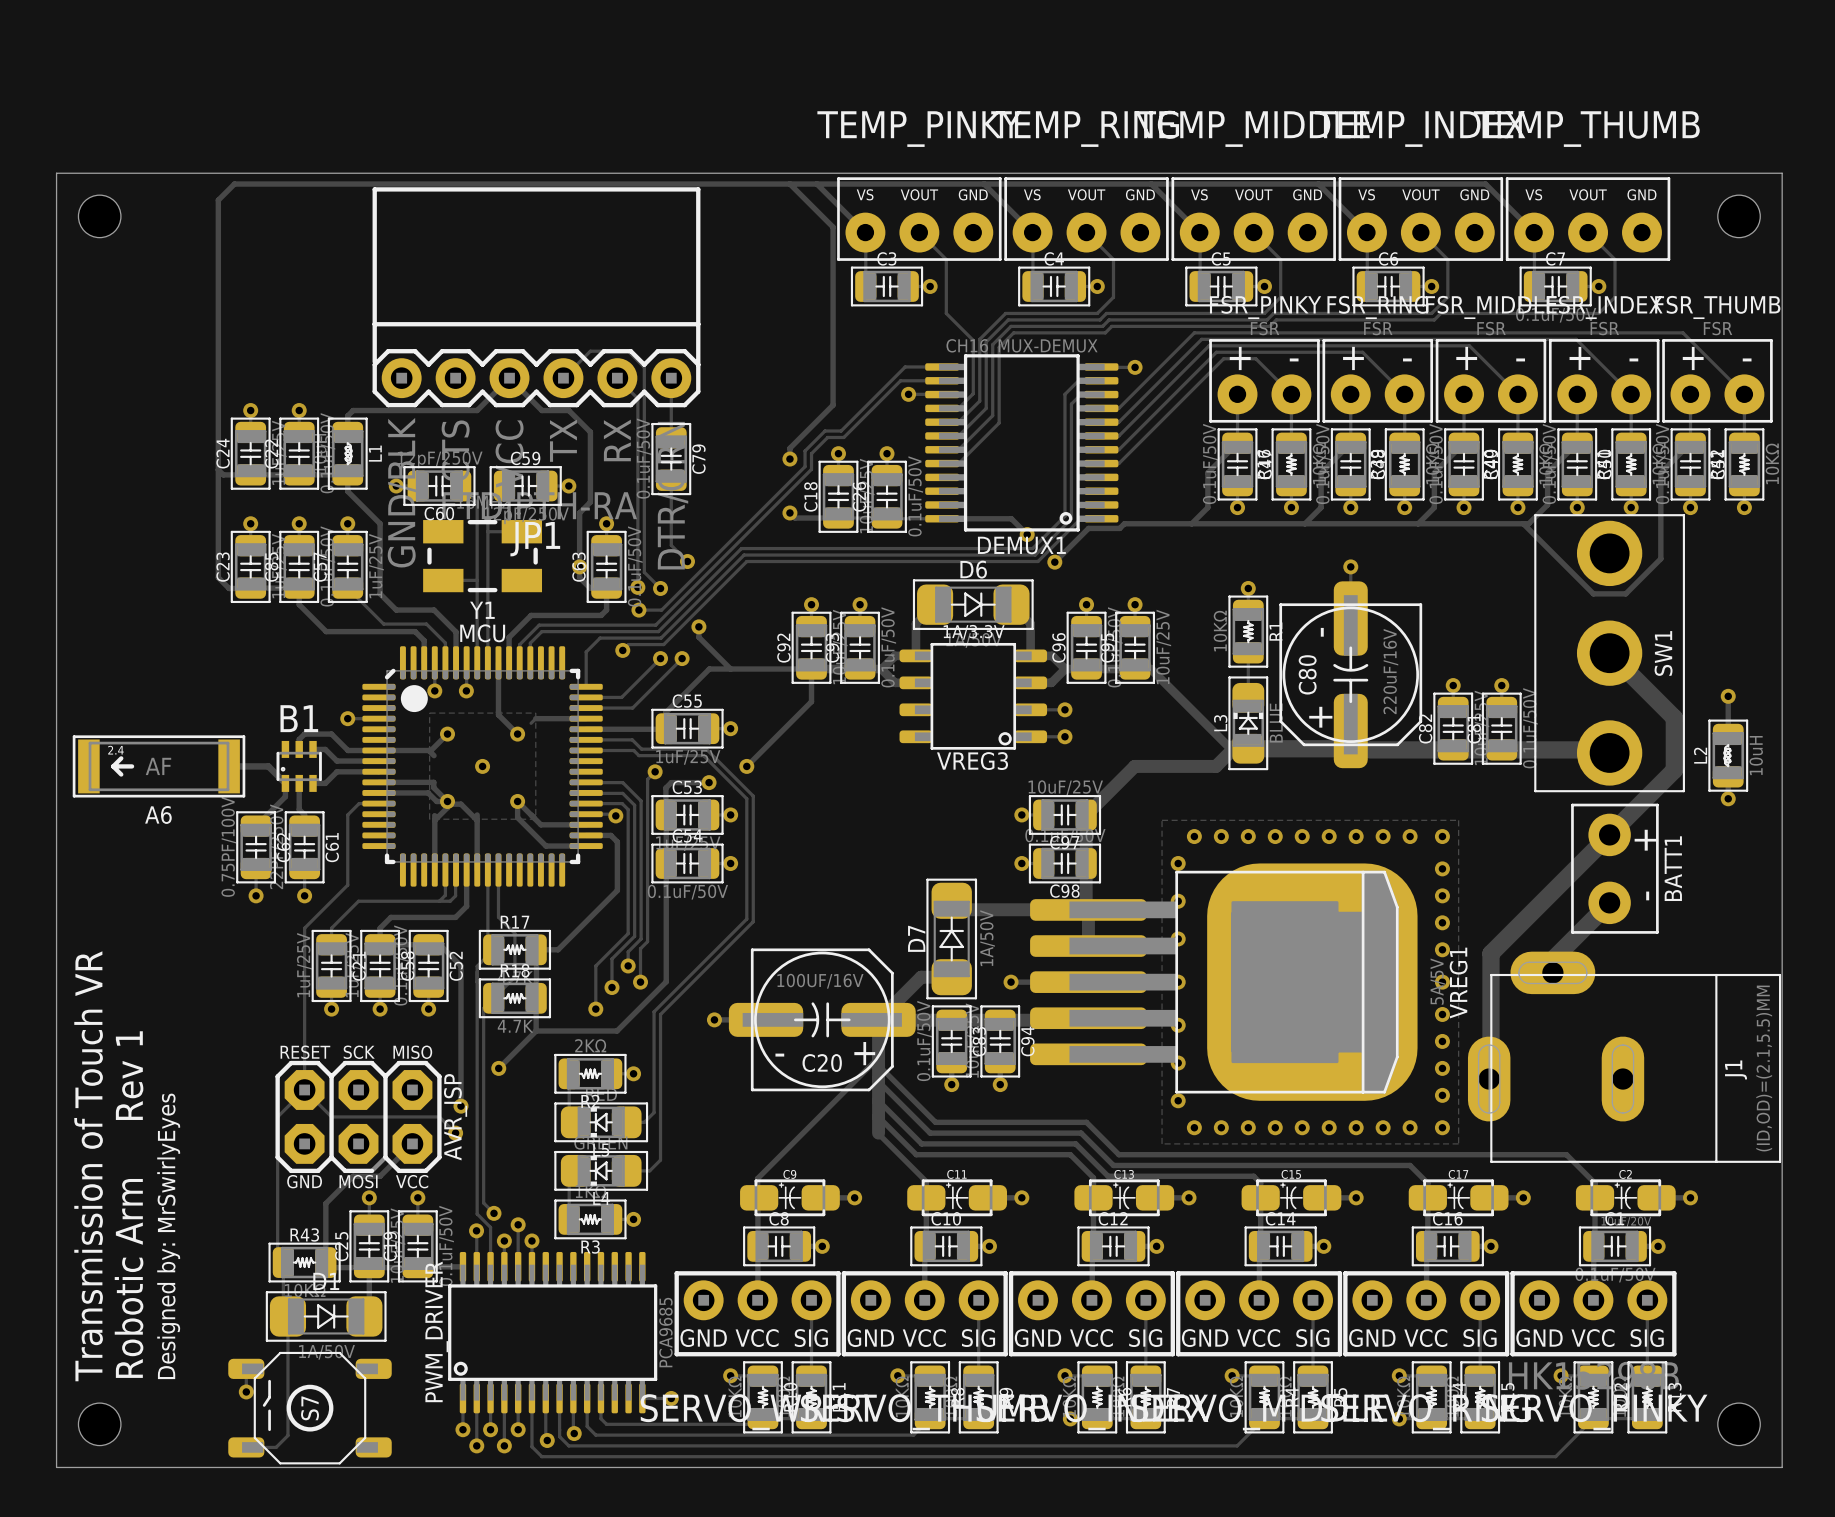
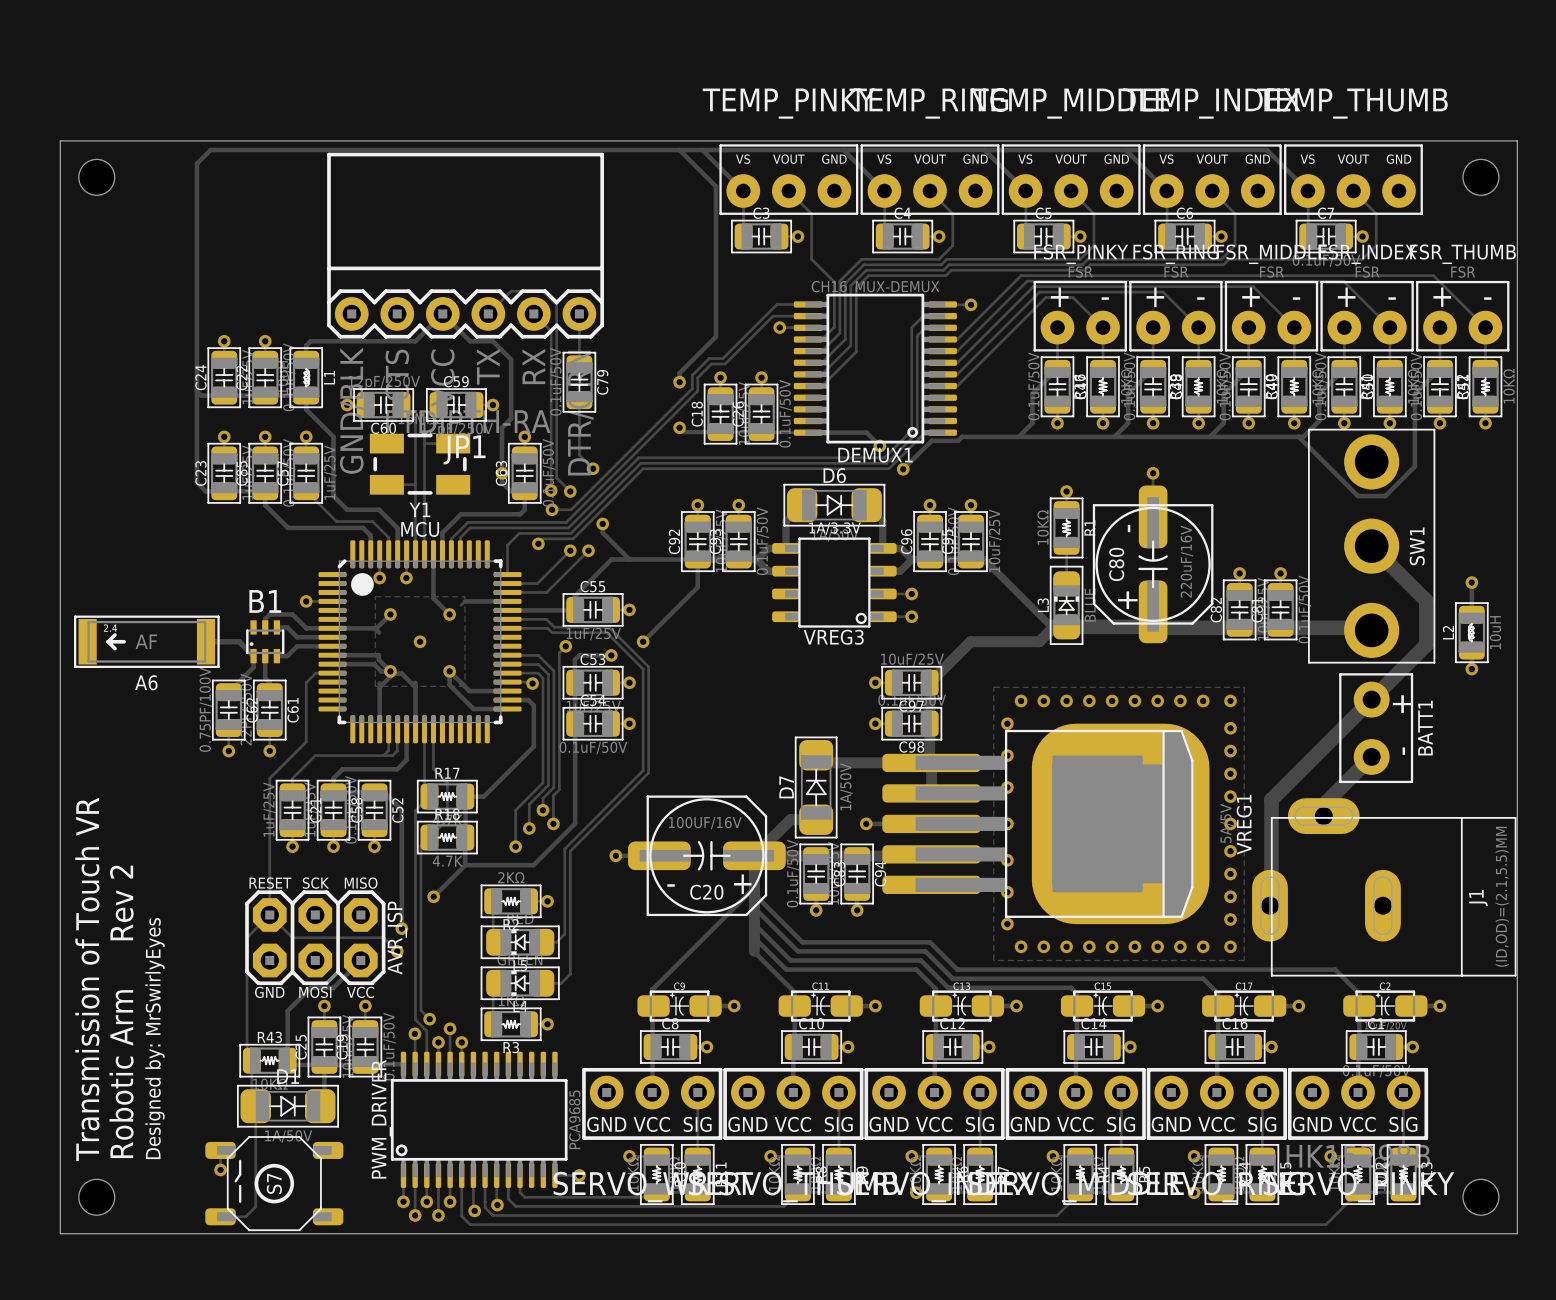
text: Robotic Arm Rev 1 (129, 1204) -> Robotic Arm Rev 2 (121, 1011)

